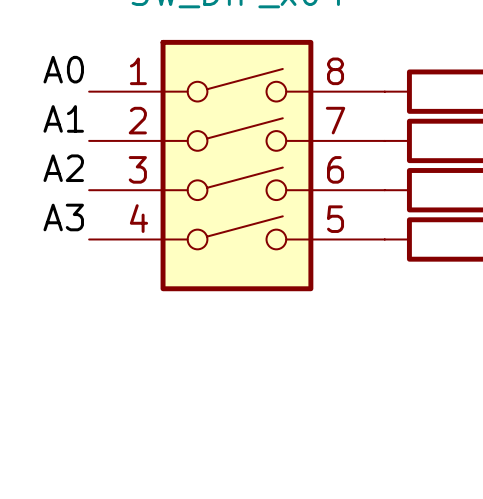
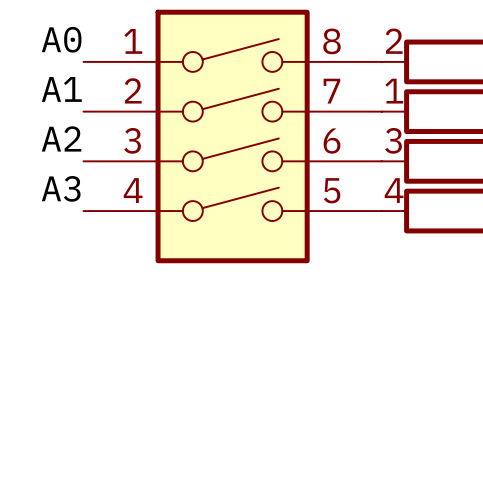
part pin number: none -> 2 (394, 41)
part pin number: none -> 1 (394, 91)
part pin number: none -> 3 (393, 140)
part pin number: none -> 4 (394, 190)

